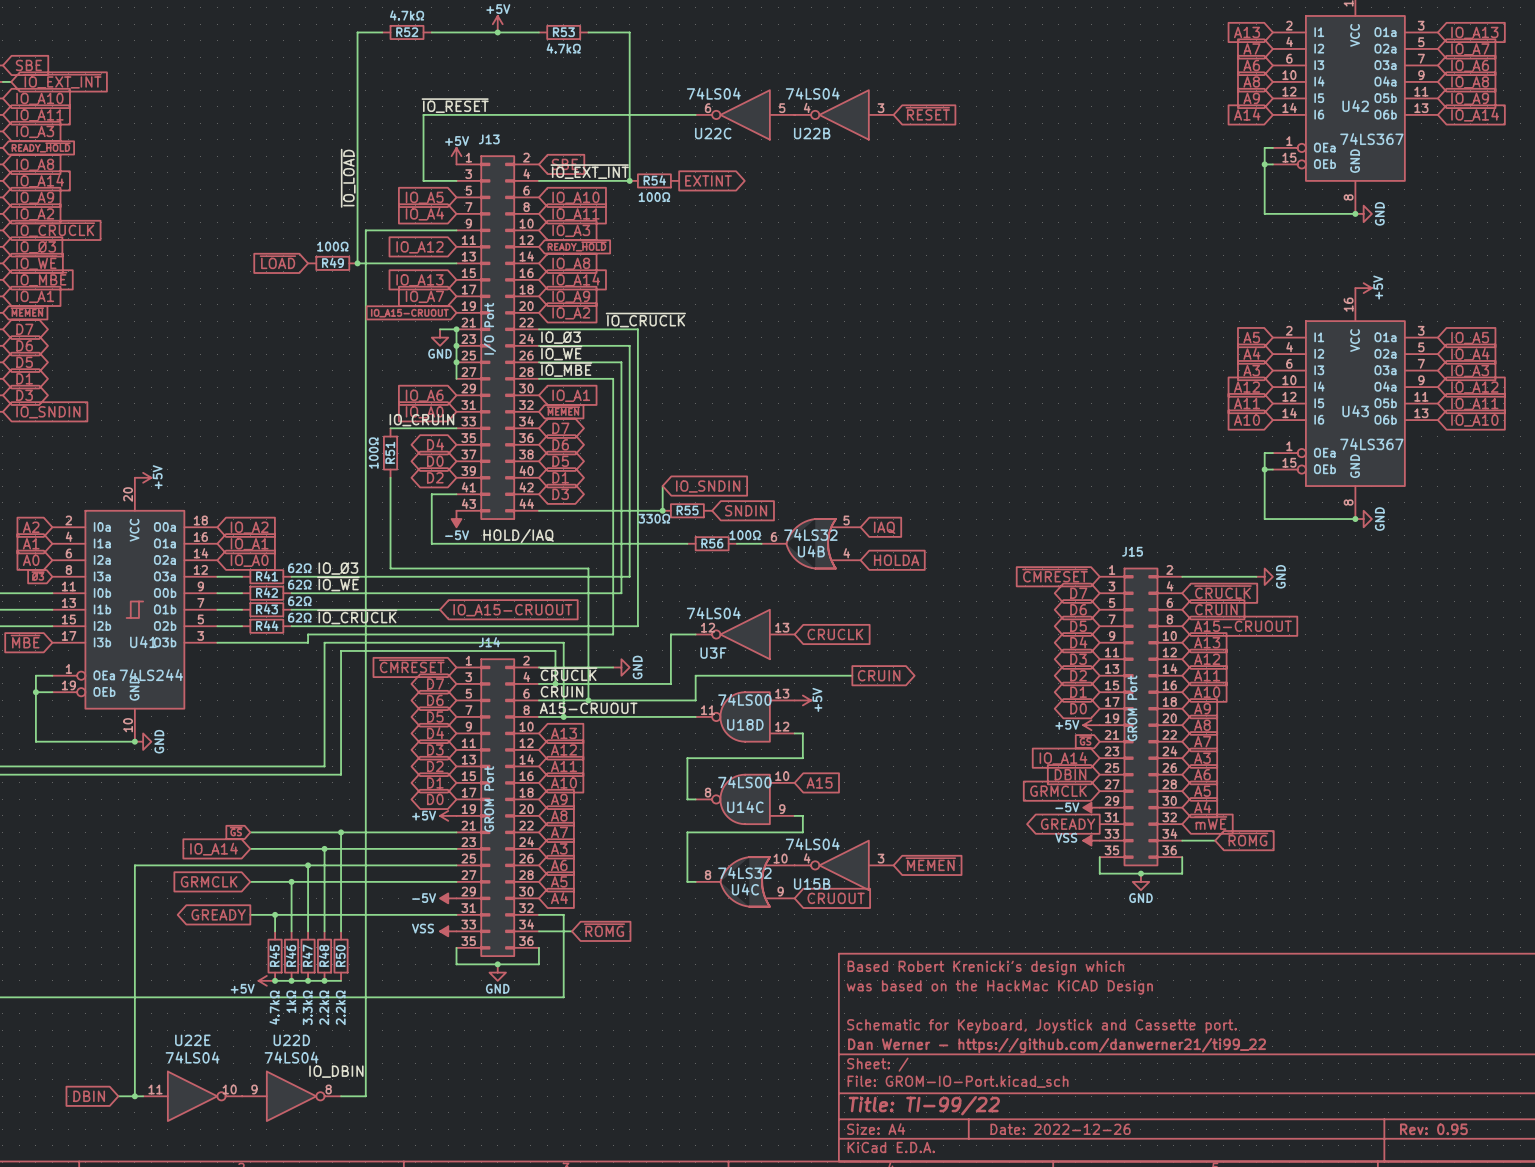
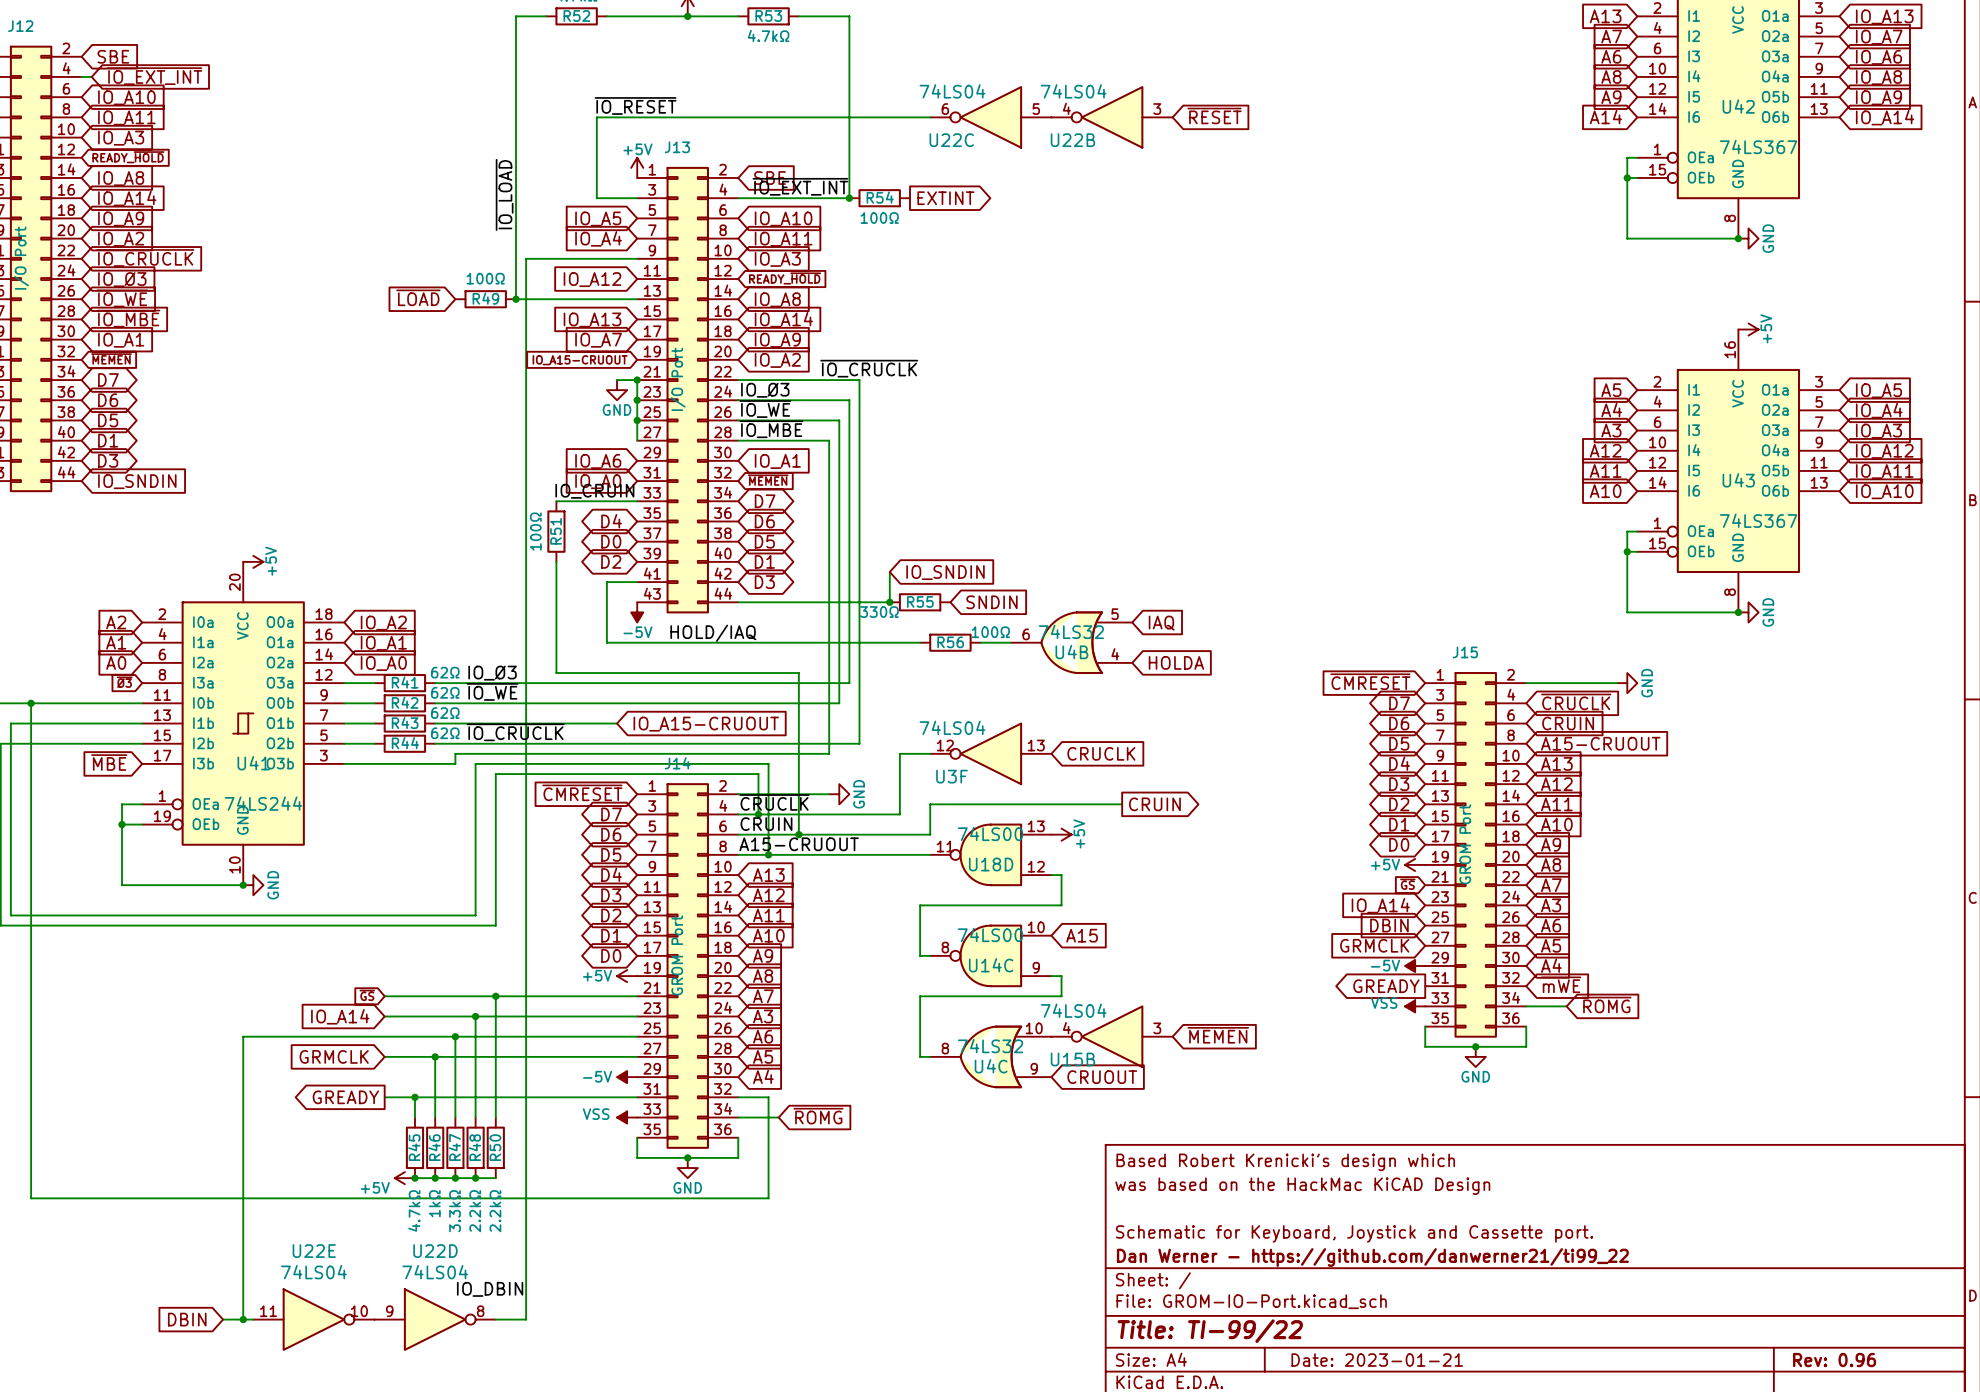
title block: Date: 2022-12-26 (1060, 1129) -> Date: 2023-01-21 (1377, 1360)
title block: Rev: 0.95 (1433, 1129) -> Rev: 0.96 (1834, 1360)

